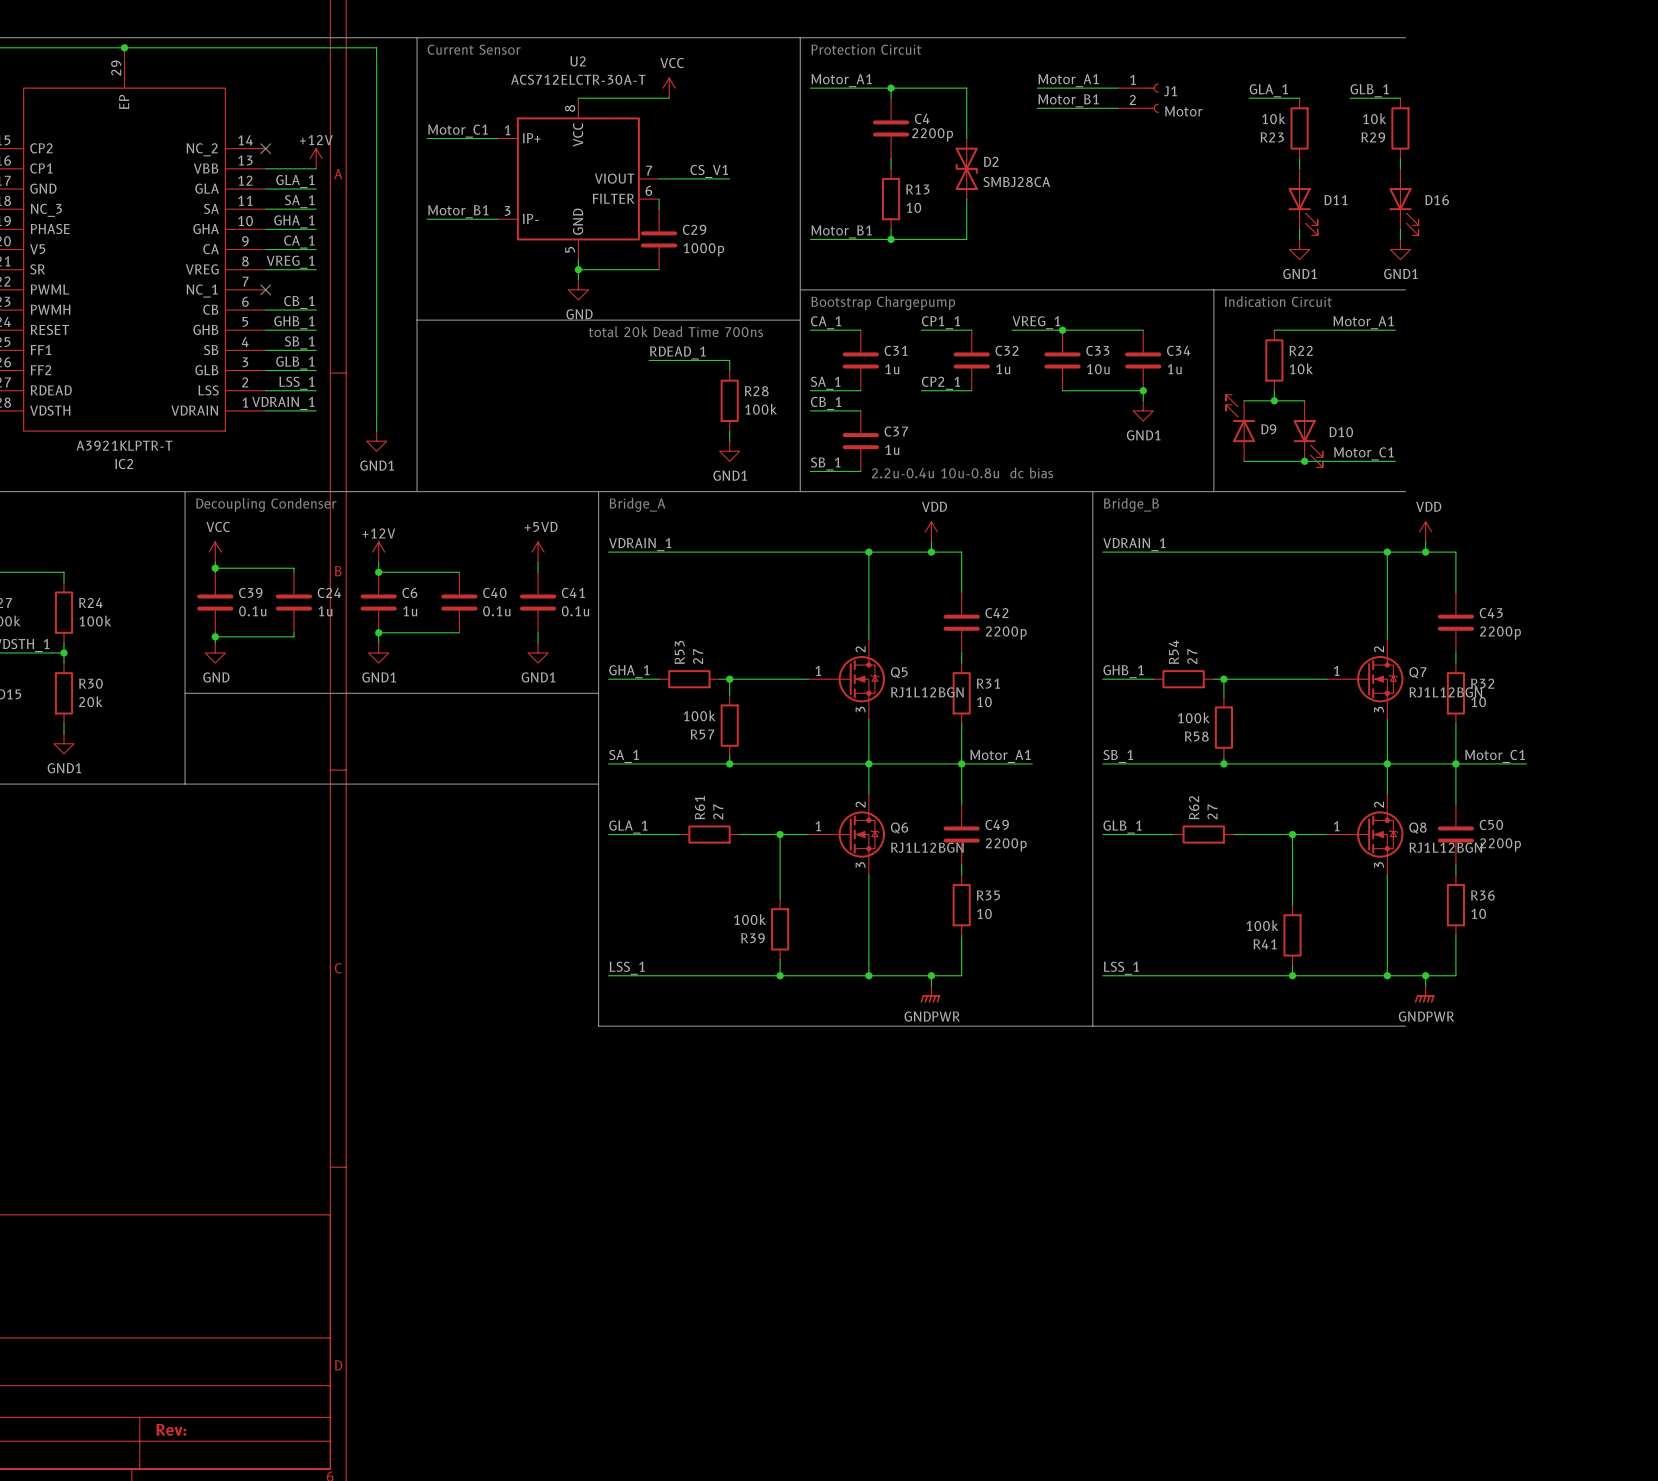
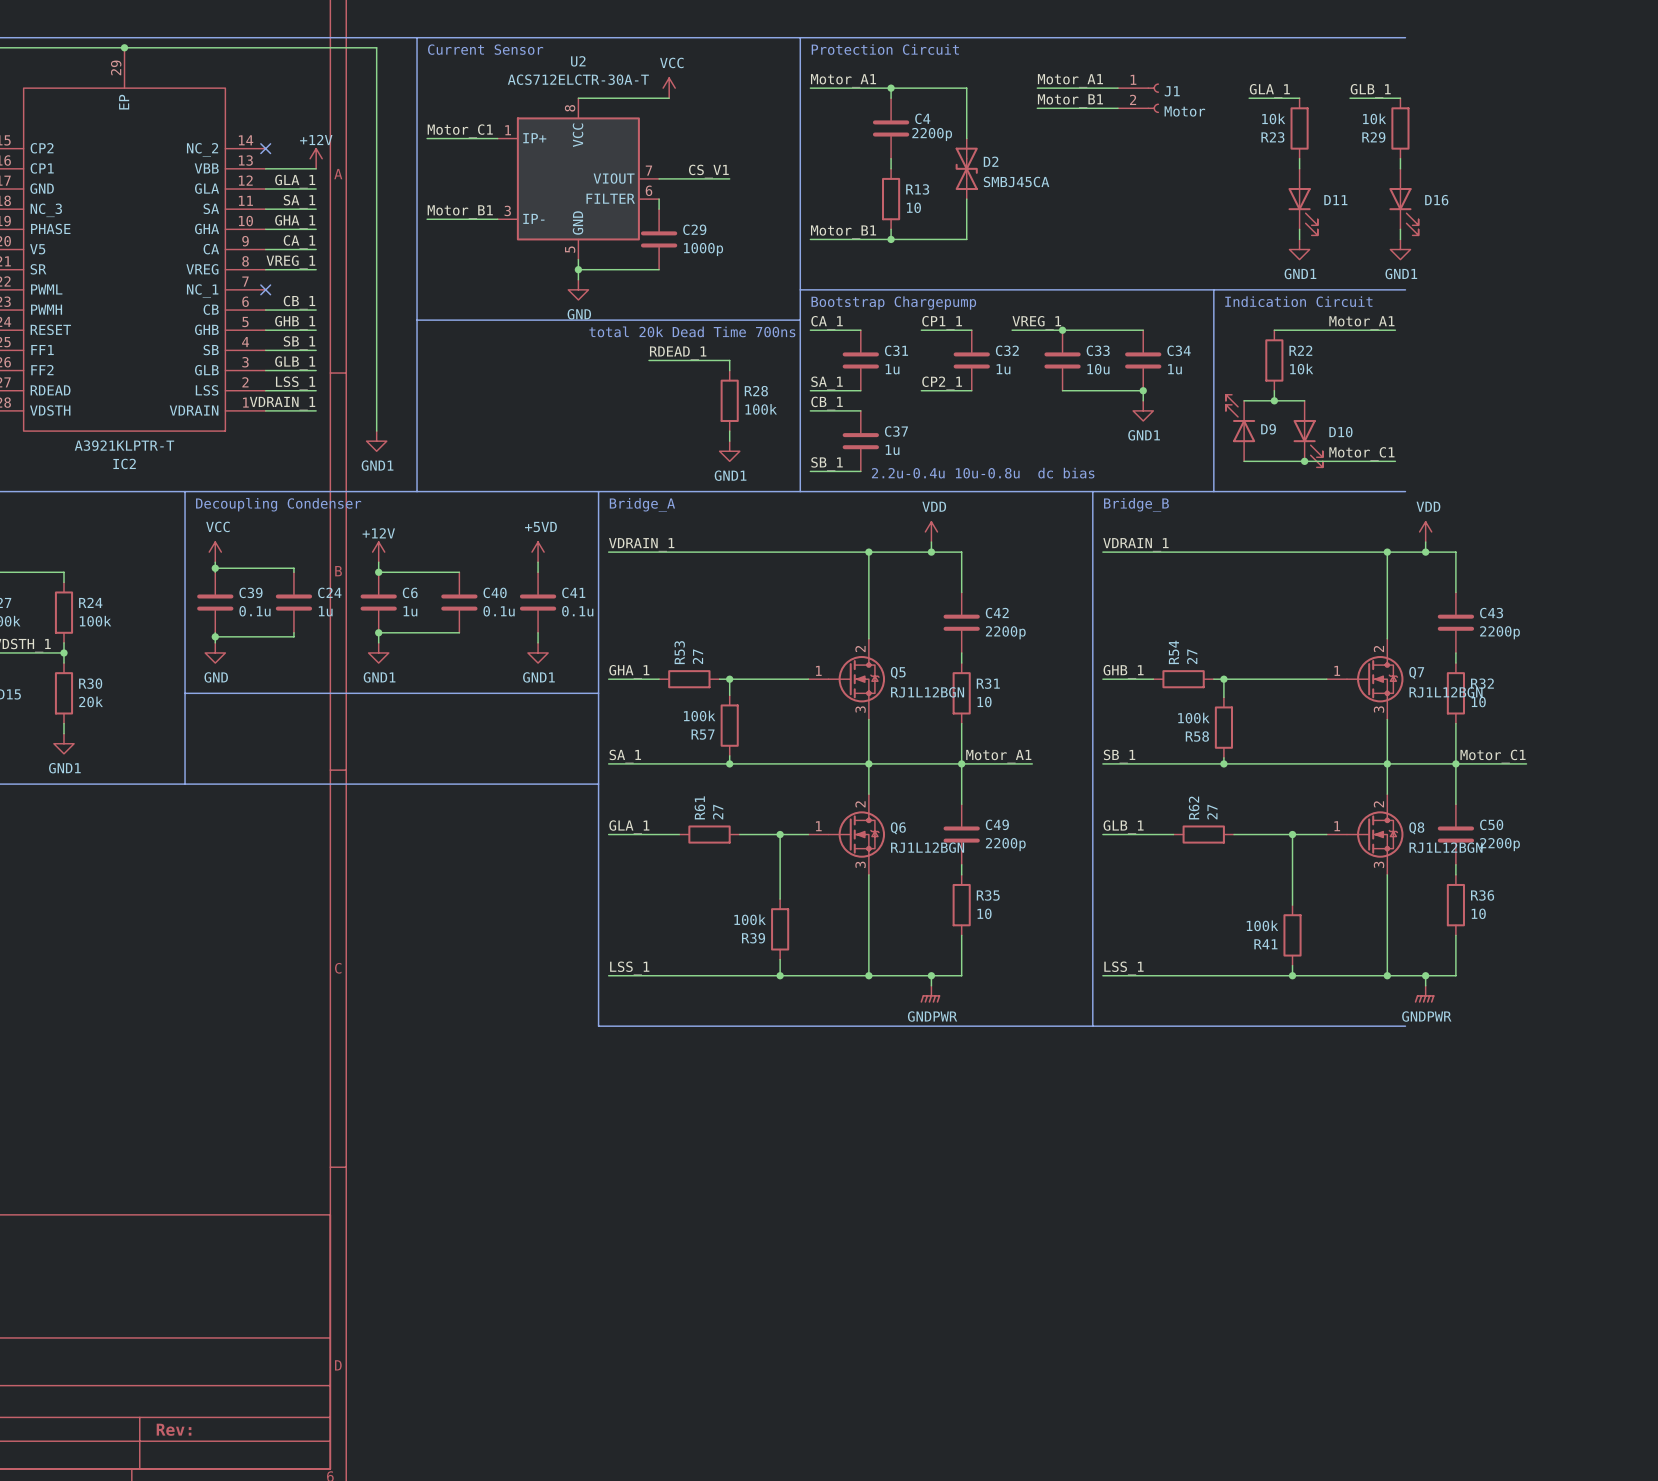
D2 value: SMBJ28CA (1016, 182) -> SMBJ45CA (1016, 181)

